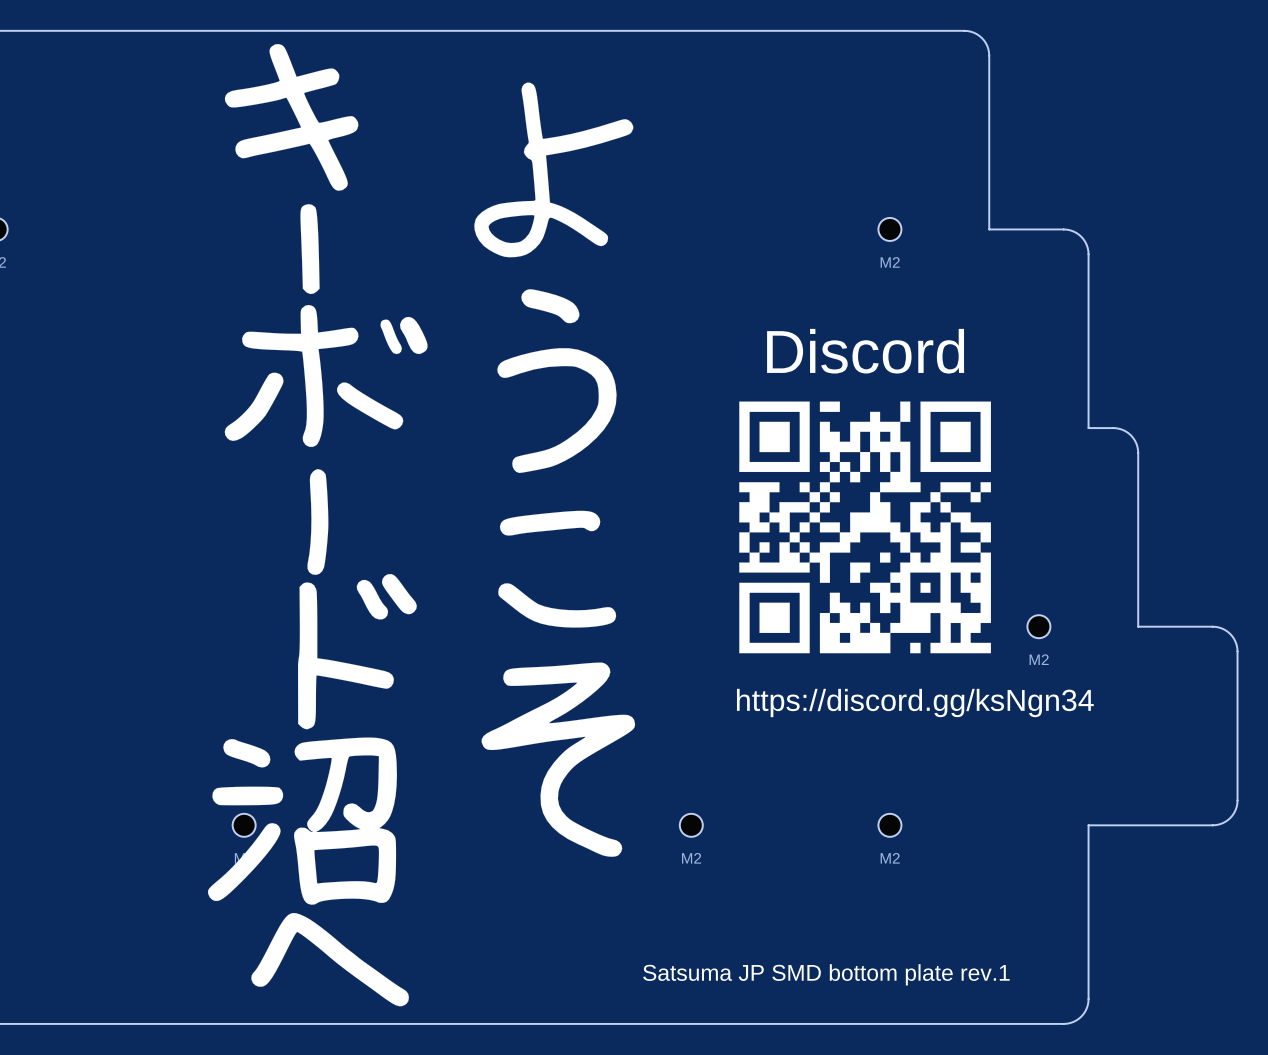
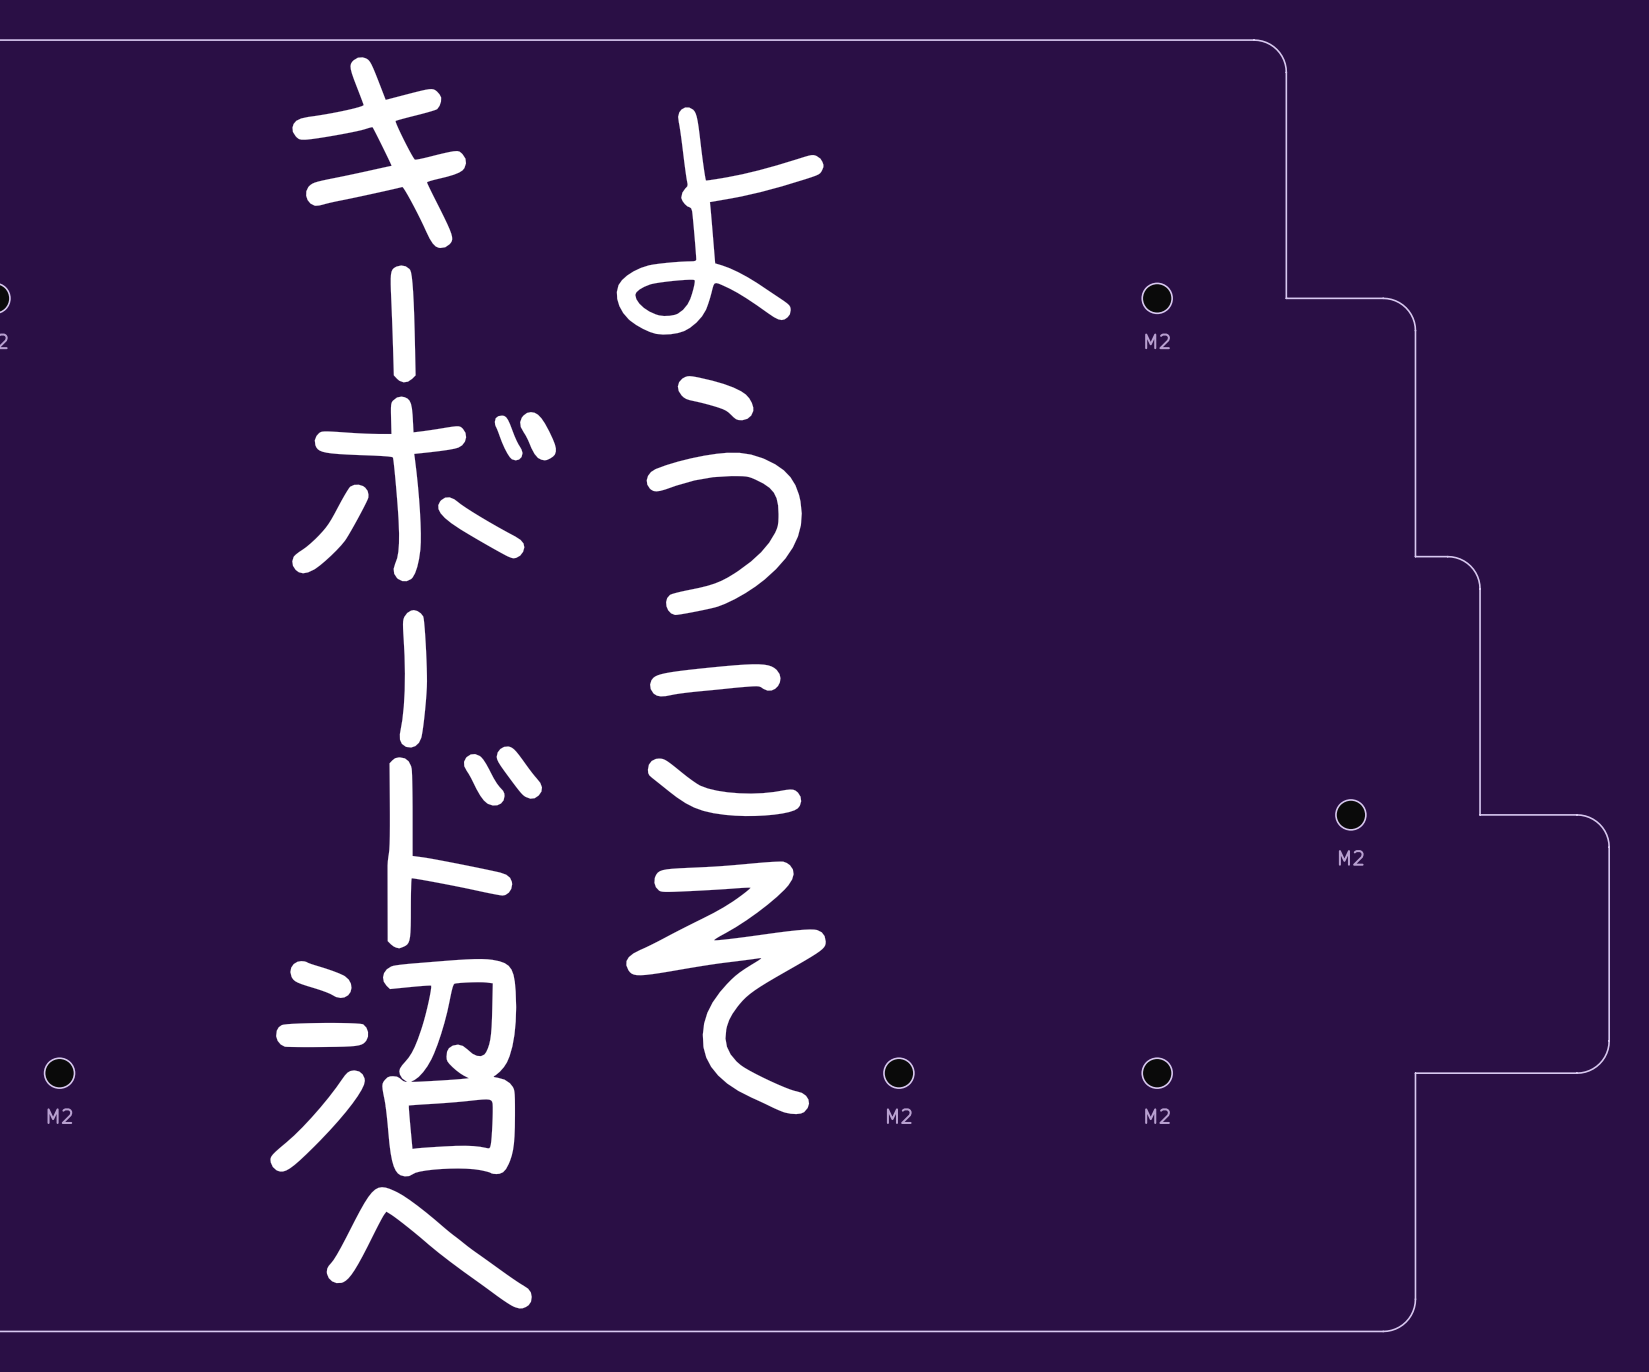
text: Discord (865, 351) -> none
drawing: [739, 401, 991, 654] -> none
text: https://discord.gg/ksNgn34 (915, 702) -> none
part position: (244, 825) -> (59, 1073)
text: Satsuma JP SMD bottom plate rev.1 (826, 974) -> none

